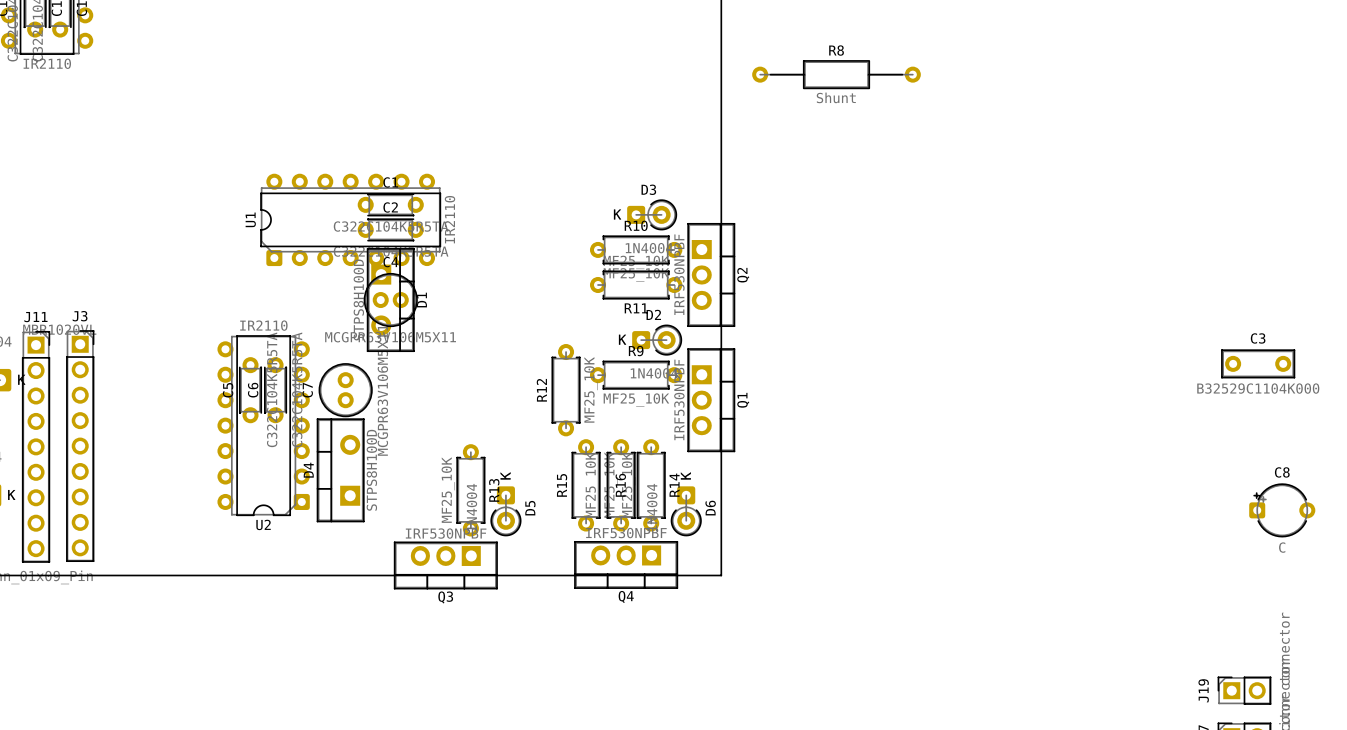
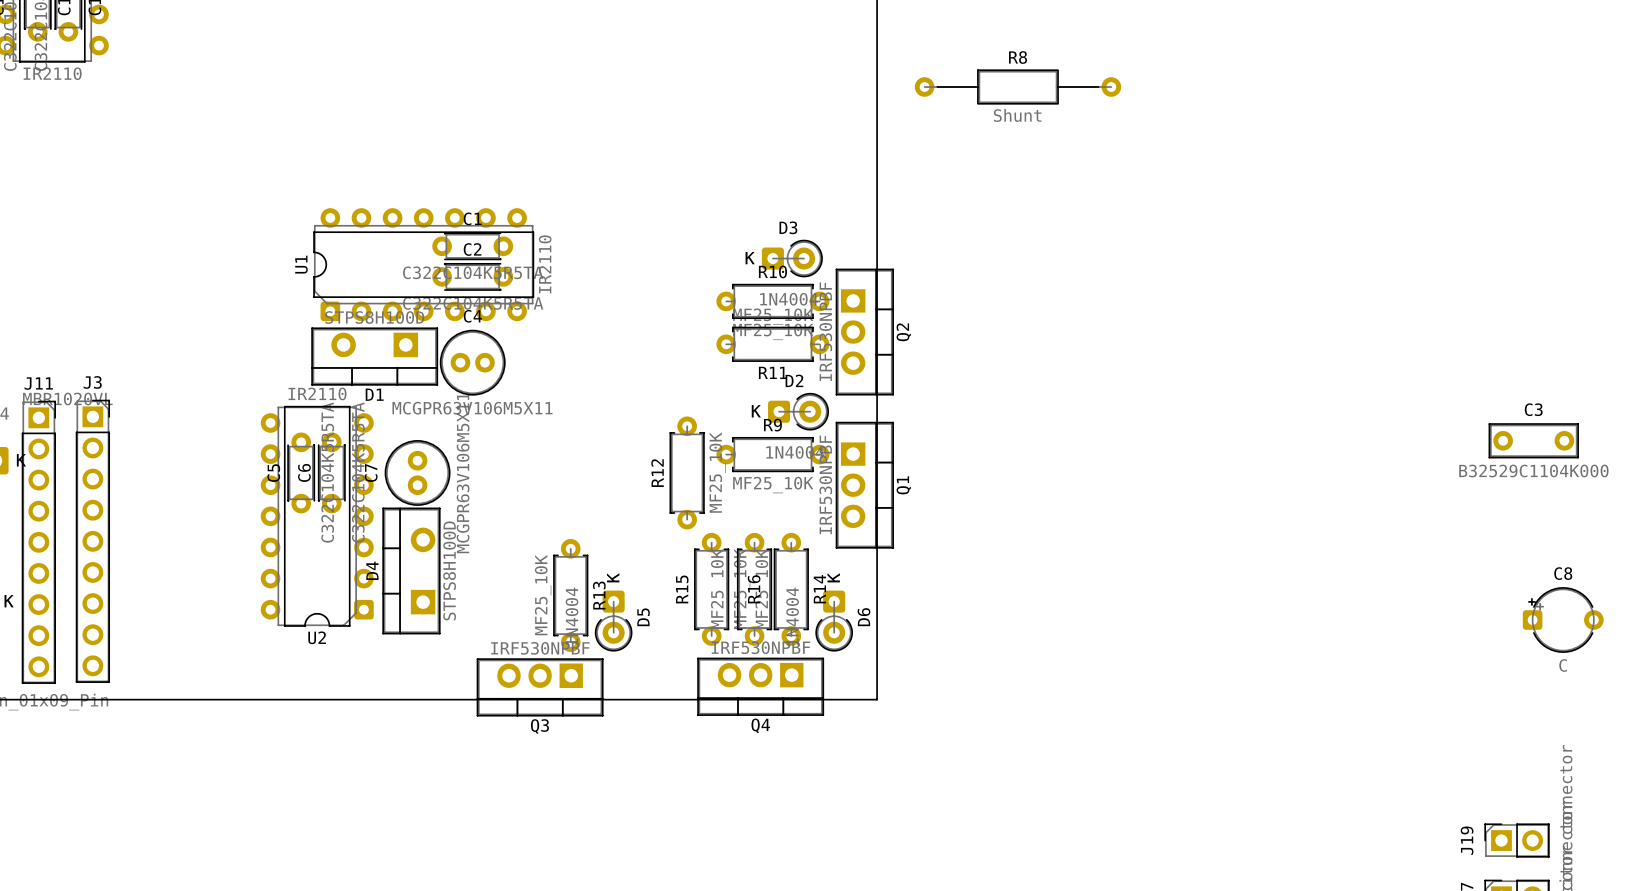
D1 rotation: 0° (390, 300) -> 90° clockwise (374, 356)
D1 position: (390, 300) -> (374, 356)

